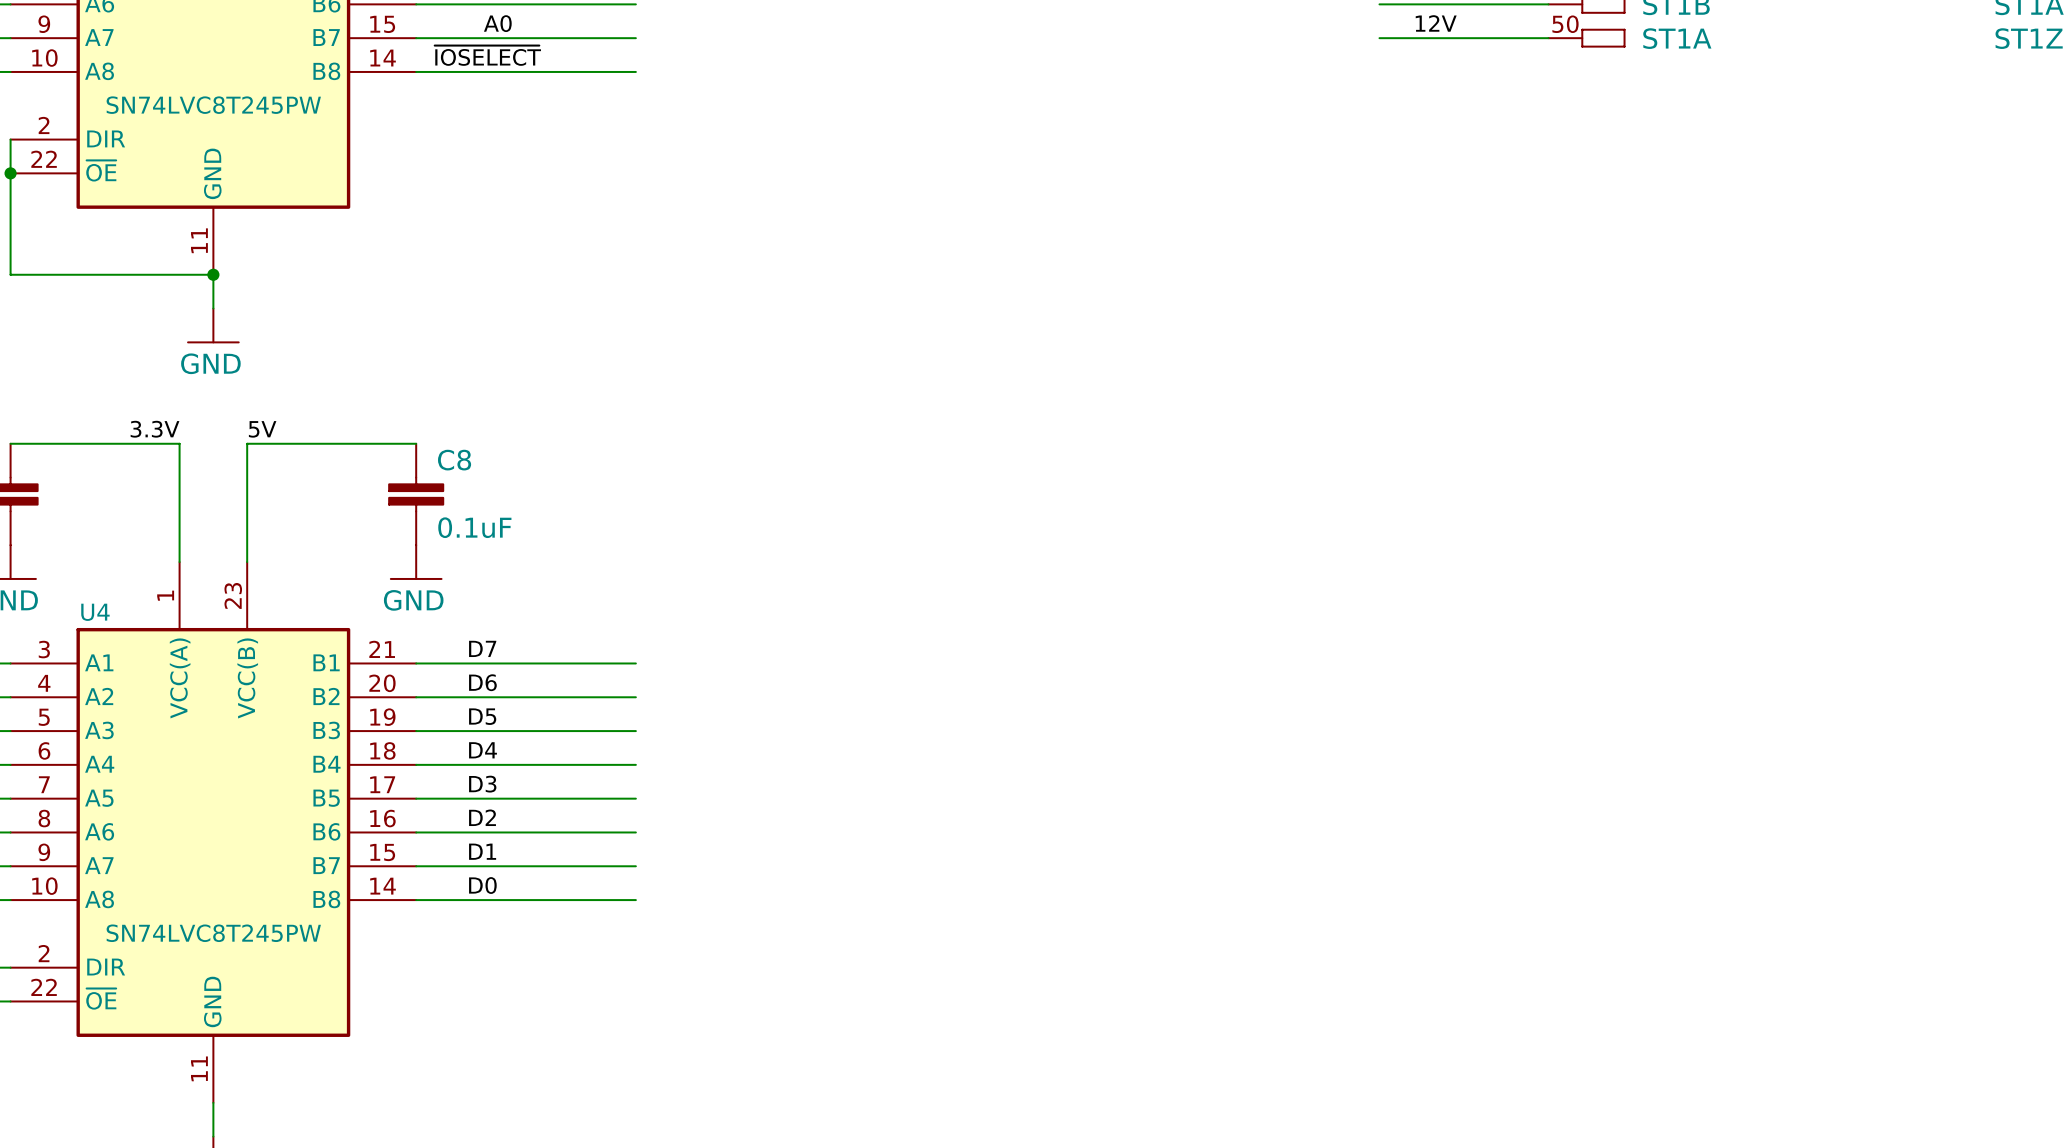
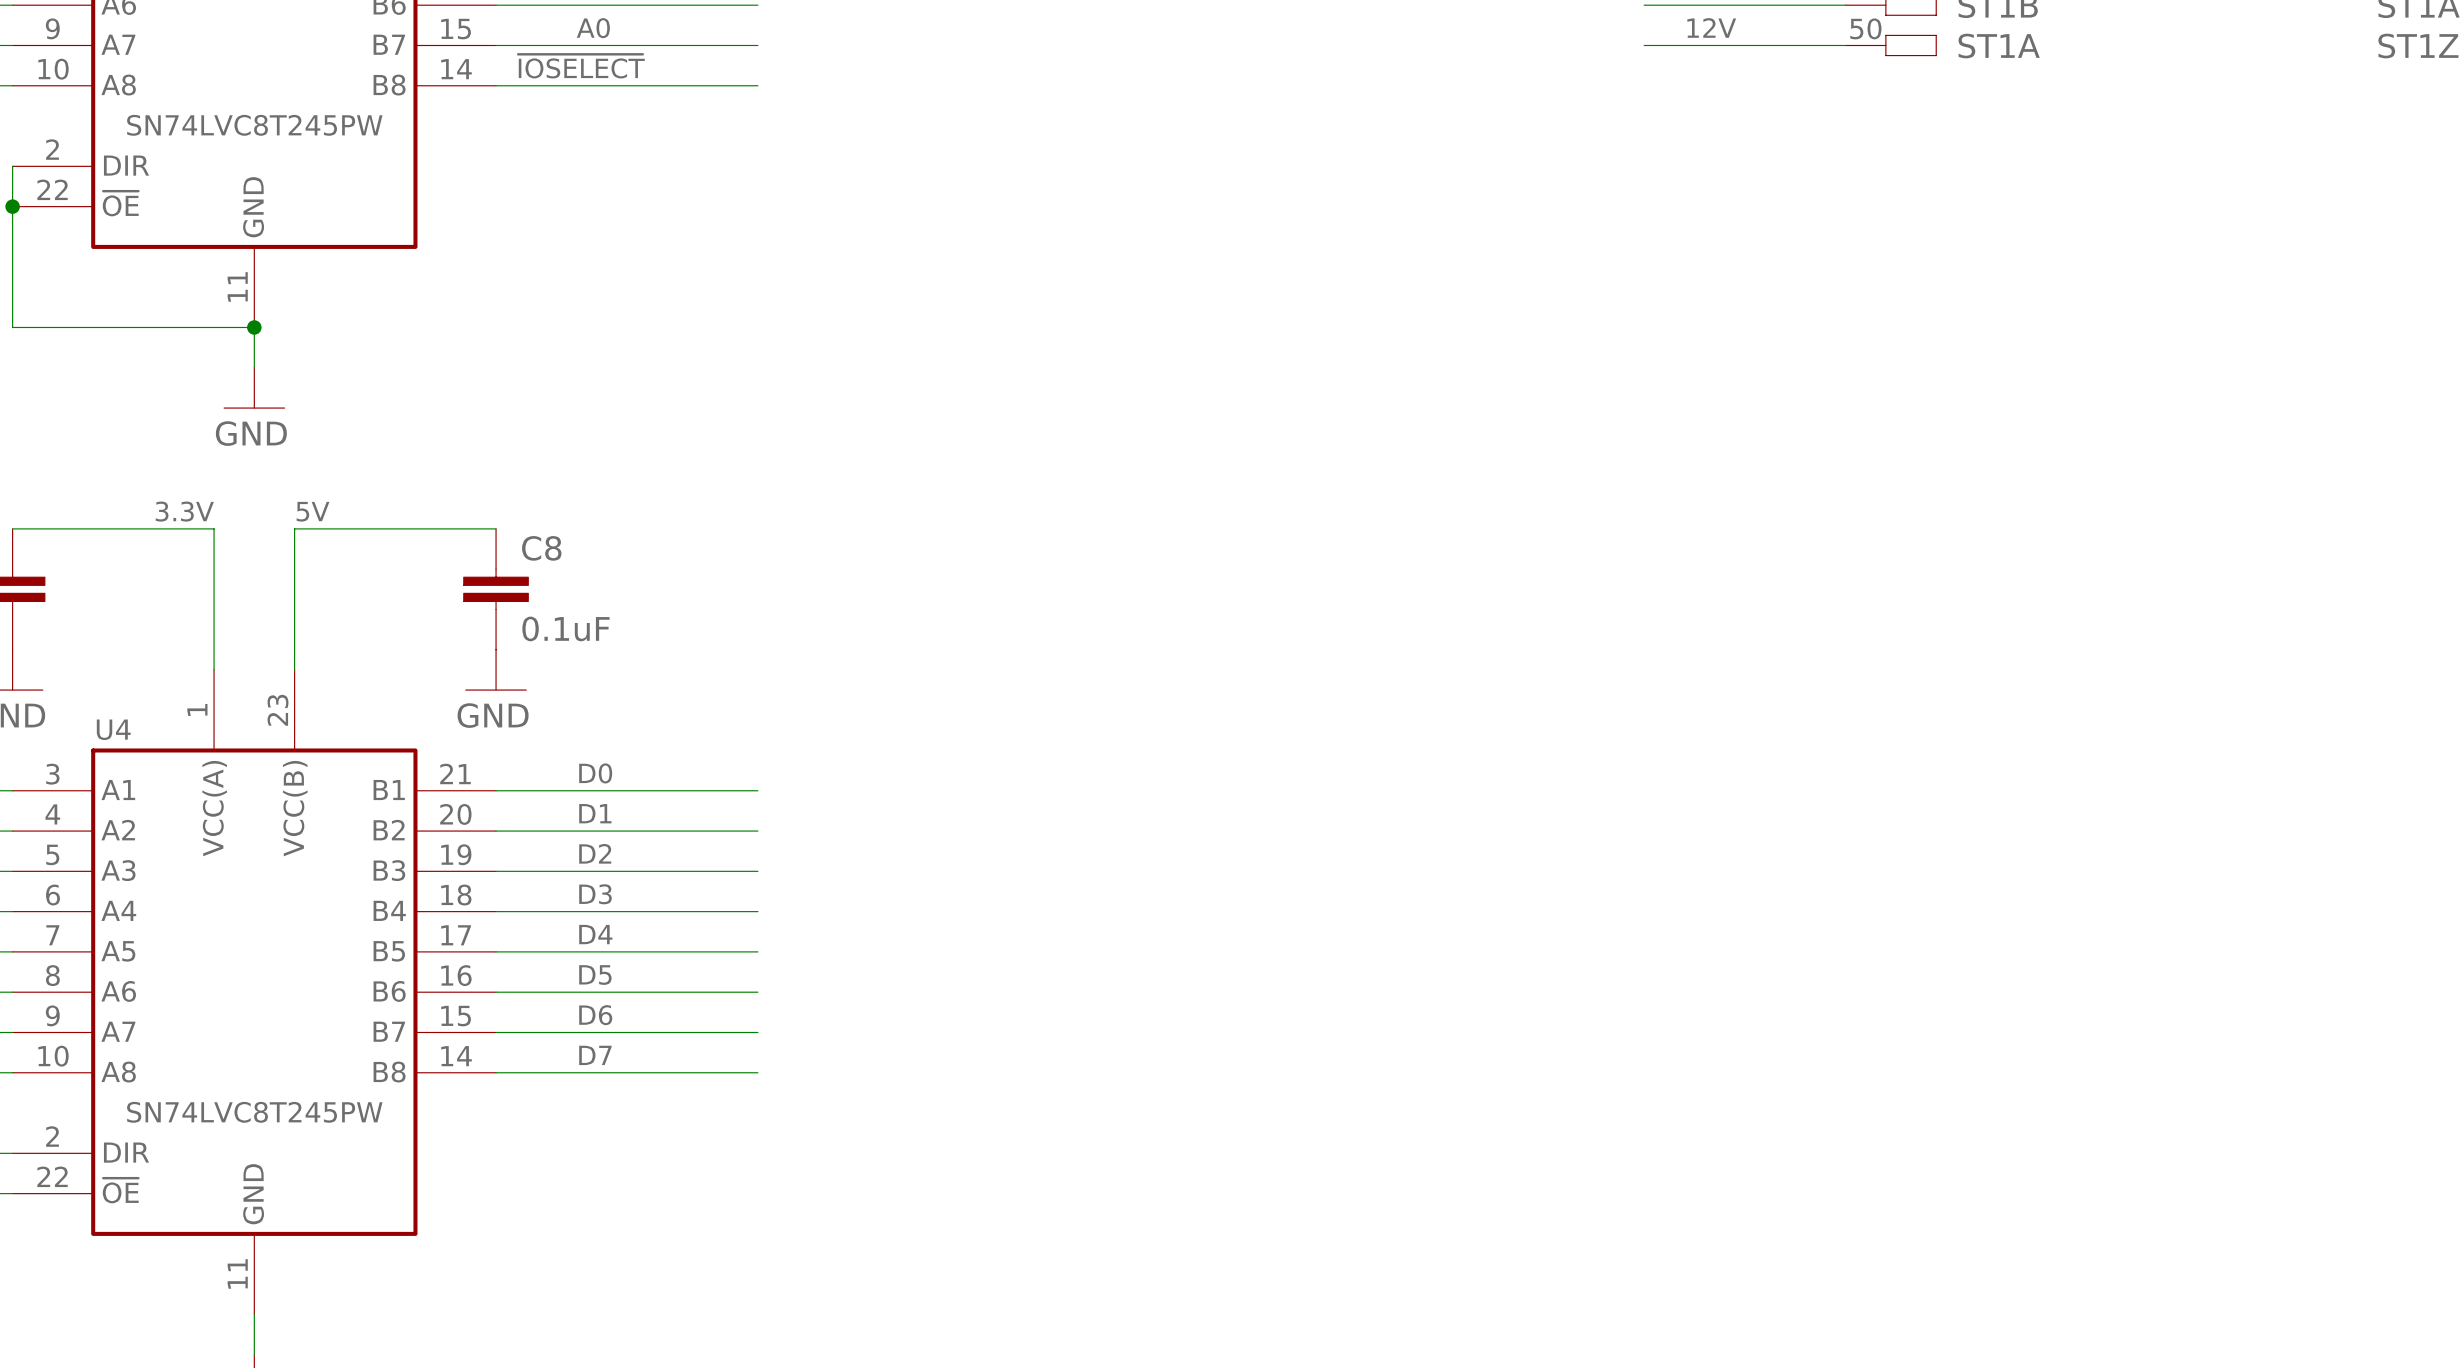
label position: D7 (482, 648) -> D7 (595, 1055)
label position: D6 (482, 682) -> D6 (595, 1015)
label position: D5 (482, 716) -> D5 (595, 975)
label position: D4 (483, 750) -> D4 (595, 934)
label position: D3 (482, 784) -> D3 (595, 894)
label position: D2 (482, 817) -> D2 (595, 853)
label position: D1 (482, 851) -> D1 (595, 813)
label position: D0 (482, 885) -> D0 (595, 773)

